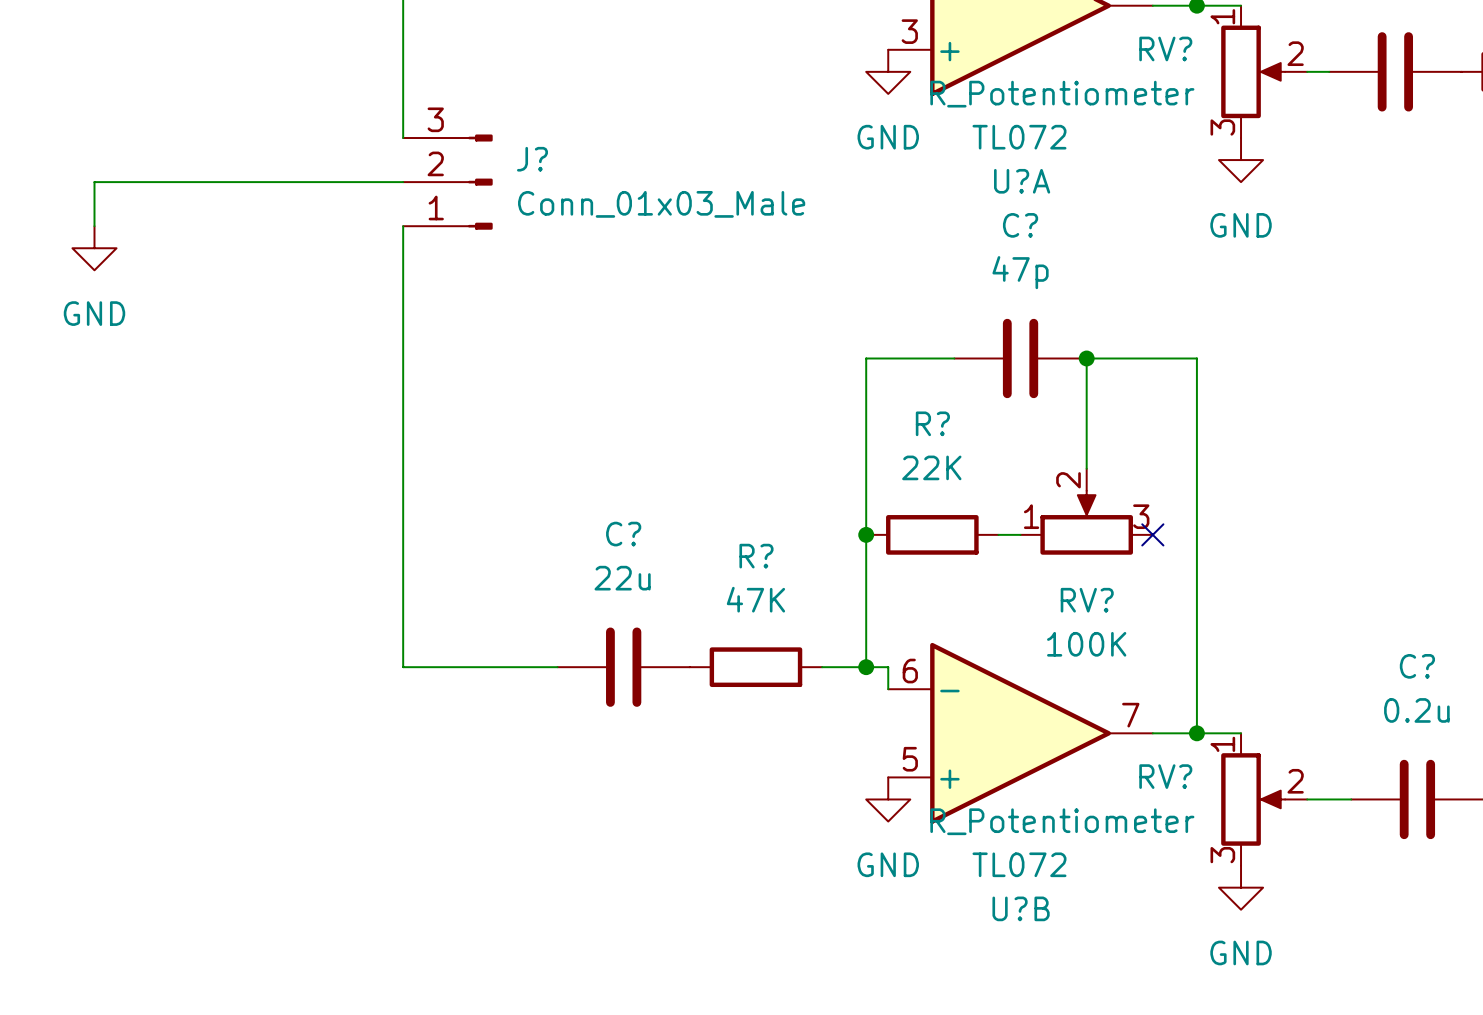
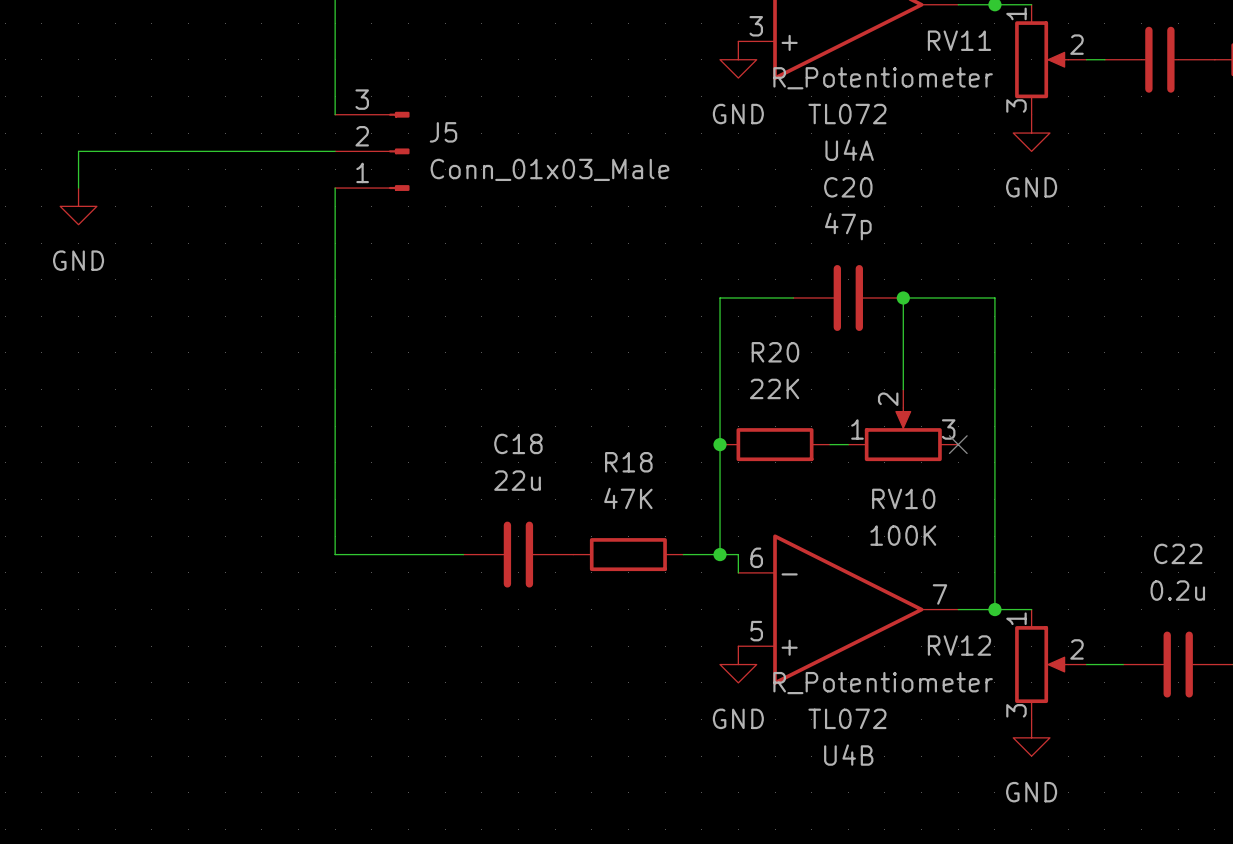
RV? name: RV? (1165, 48) -> RV11 (959, 40)
J? name: J? (532, 159) -> J5 (443, 132)
U?A name: U?A (1022, 181) -> U4A (849, 150)
C? name: C? (1020, 225) -> C20 (848, 187)
R? name: R? (932, 423) -> R20 (775, 352)
C? name: C? (623, 534) -> C18 (518, 443)
R? name: R? (756, 556) -> R18 (628, 462)
RV? name: RV? (1087, 600) -> RV10 (903, 498)
C? name: C? (1417, 666) -> C22 (1178, 553)
RV? name: RV? (1165, 776) -> RV12 (959, 645)
U?B name: U?B (1021, 908) -> U4B (848, 755)

